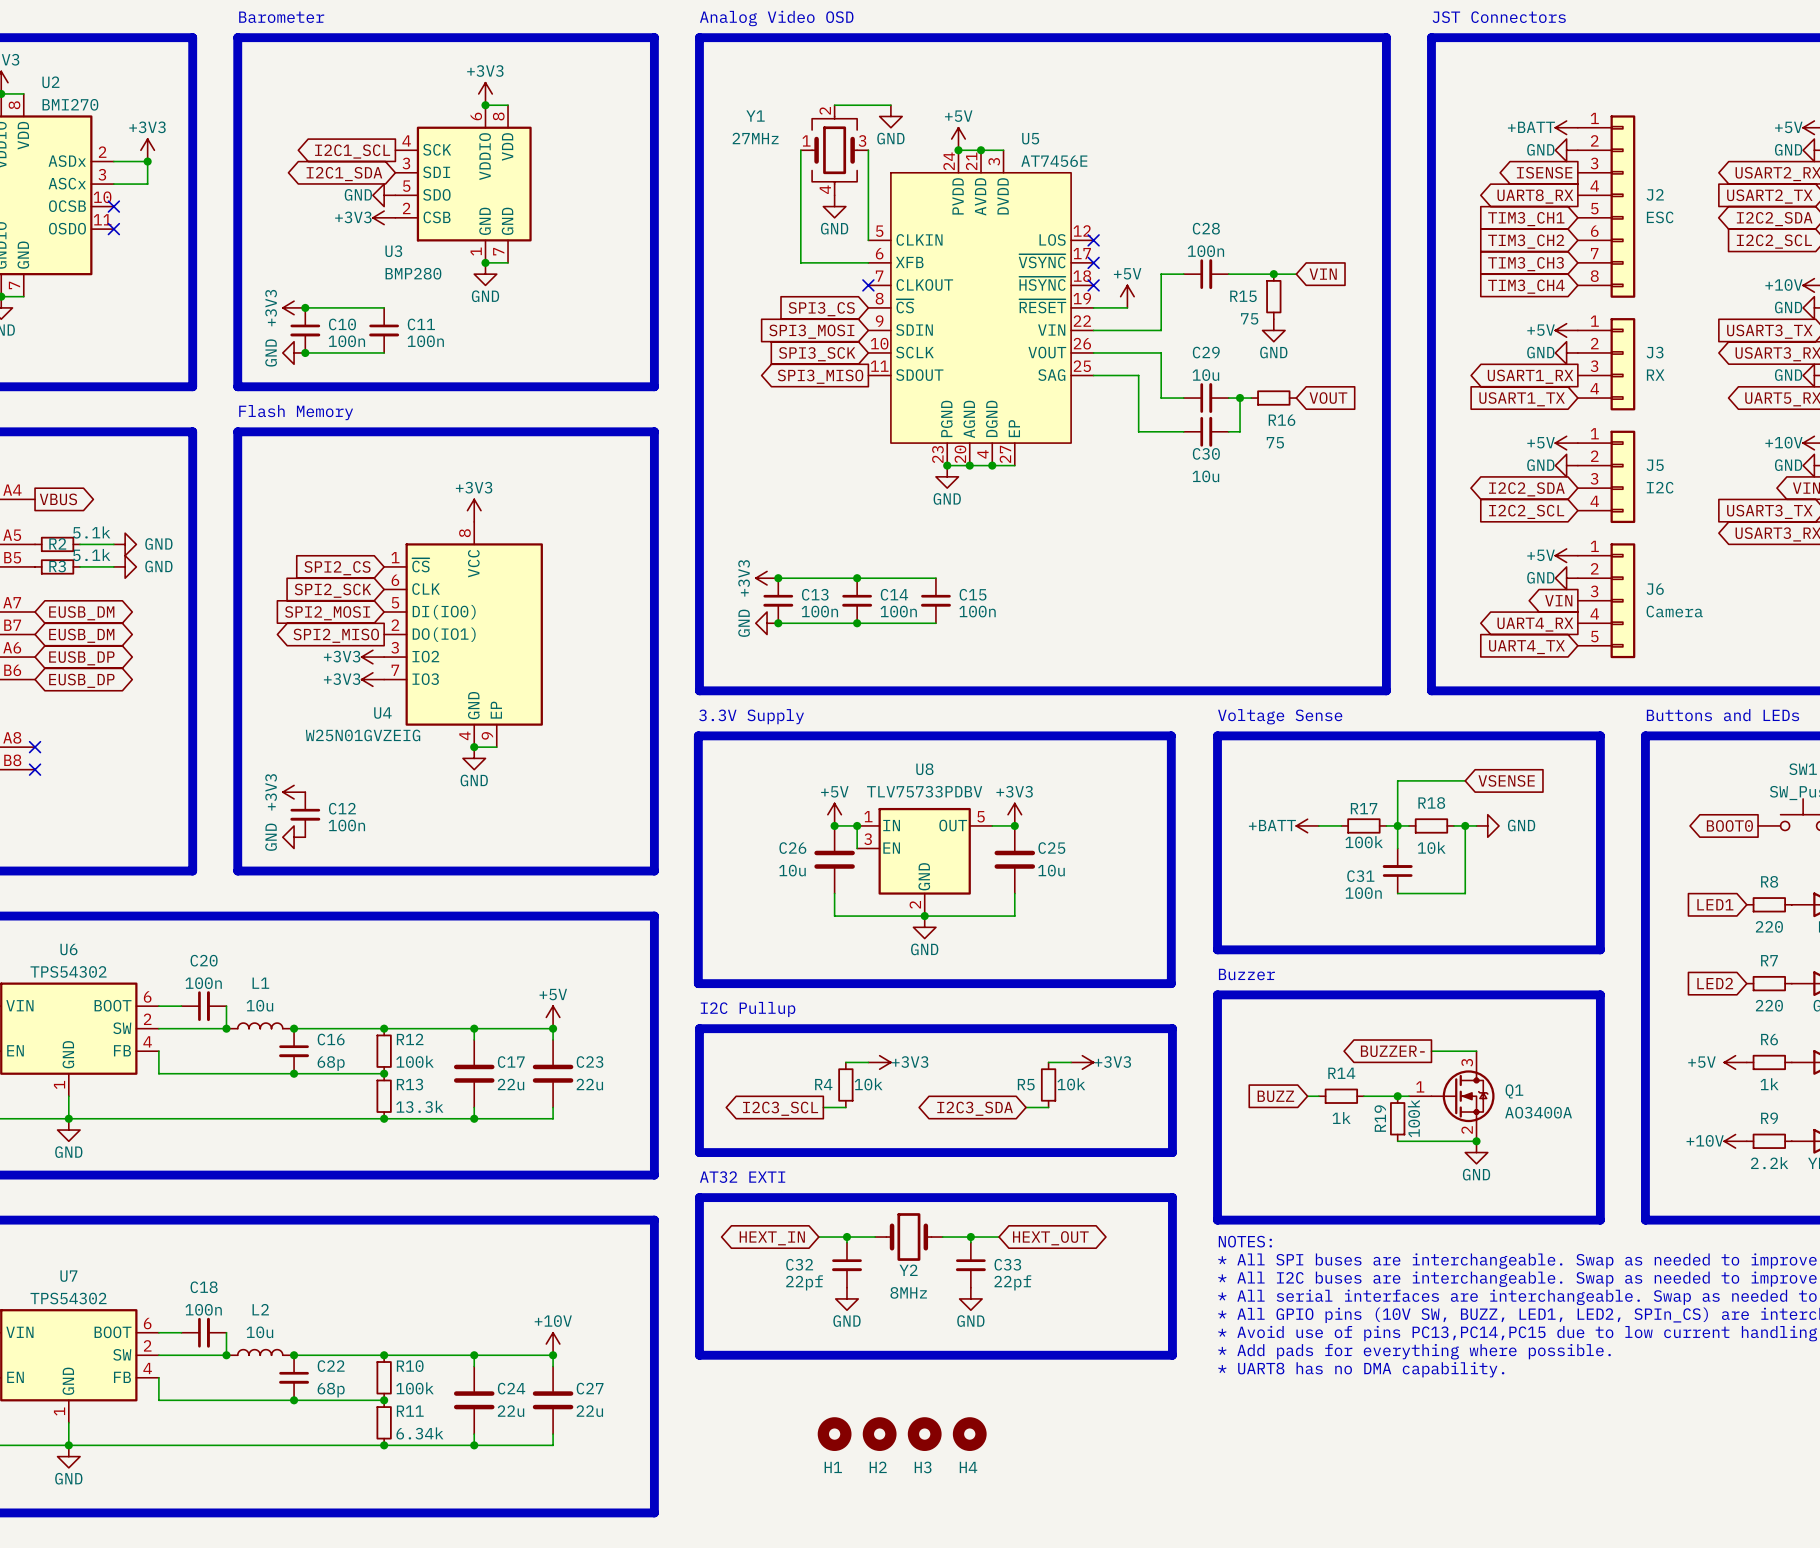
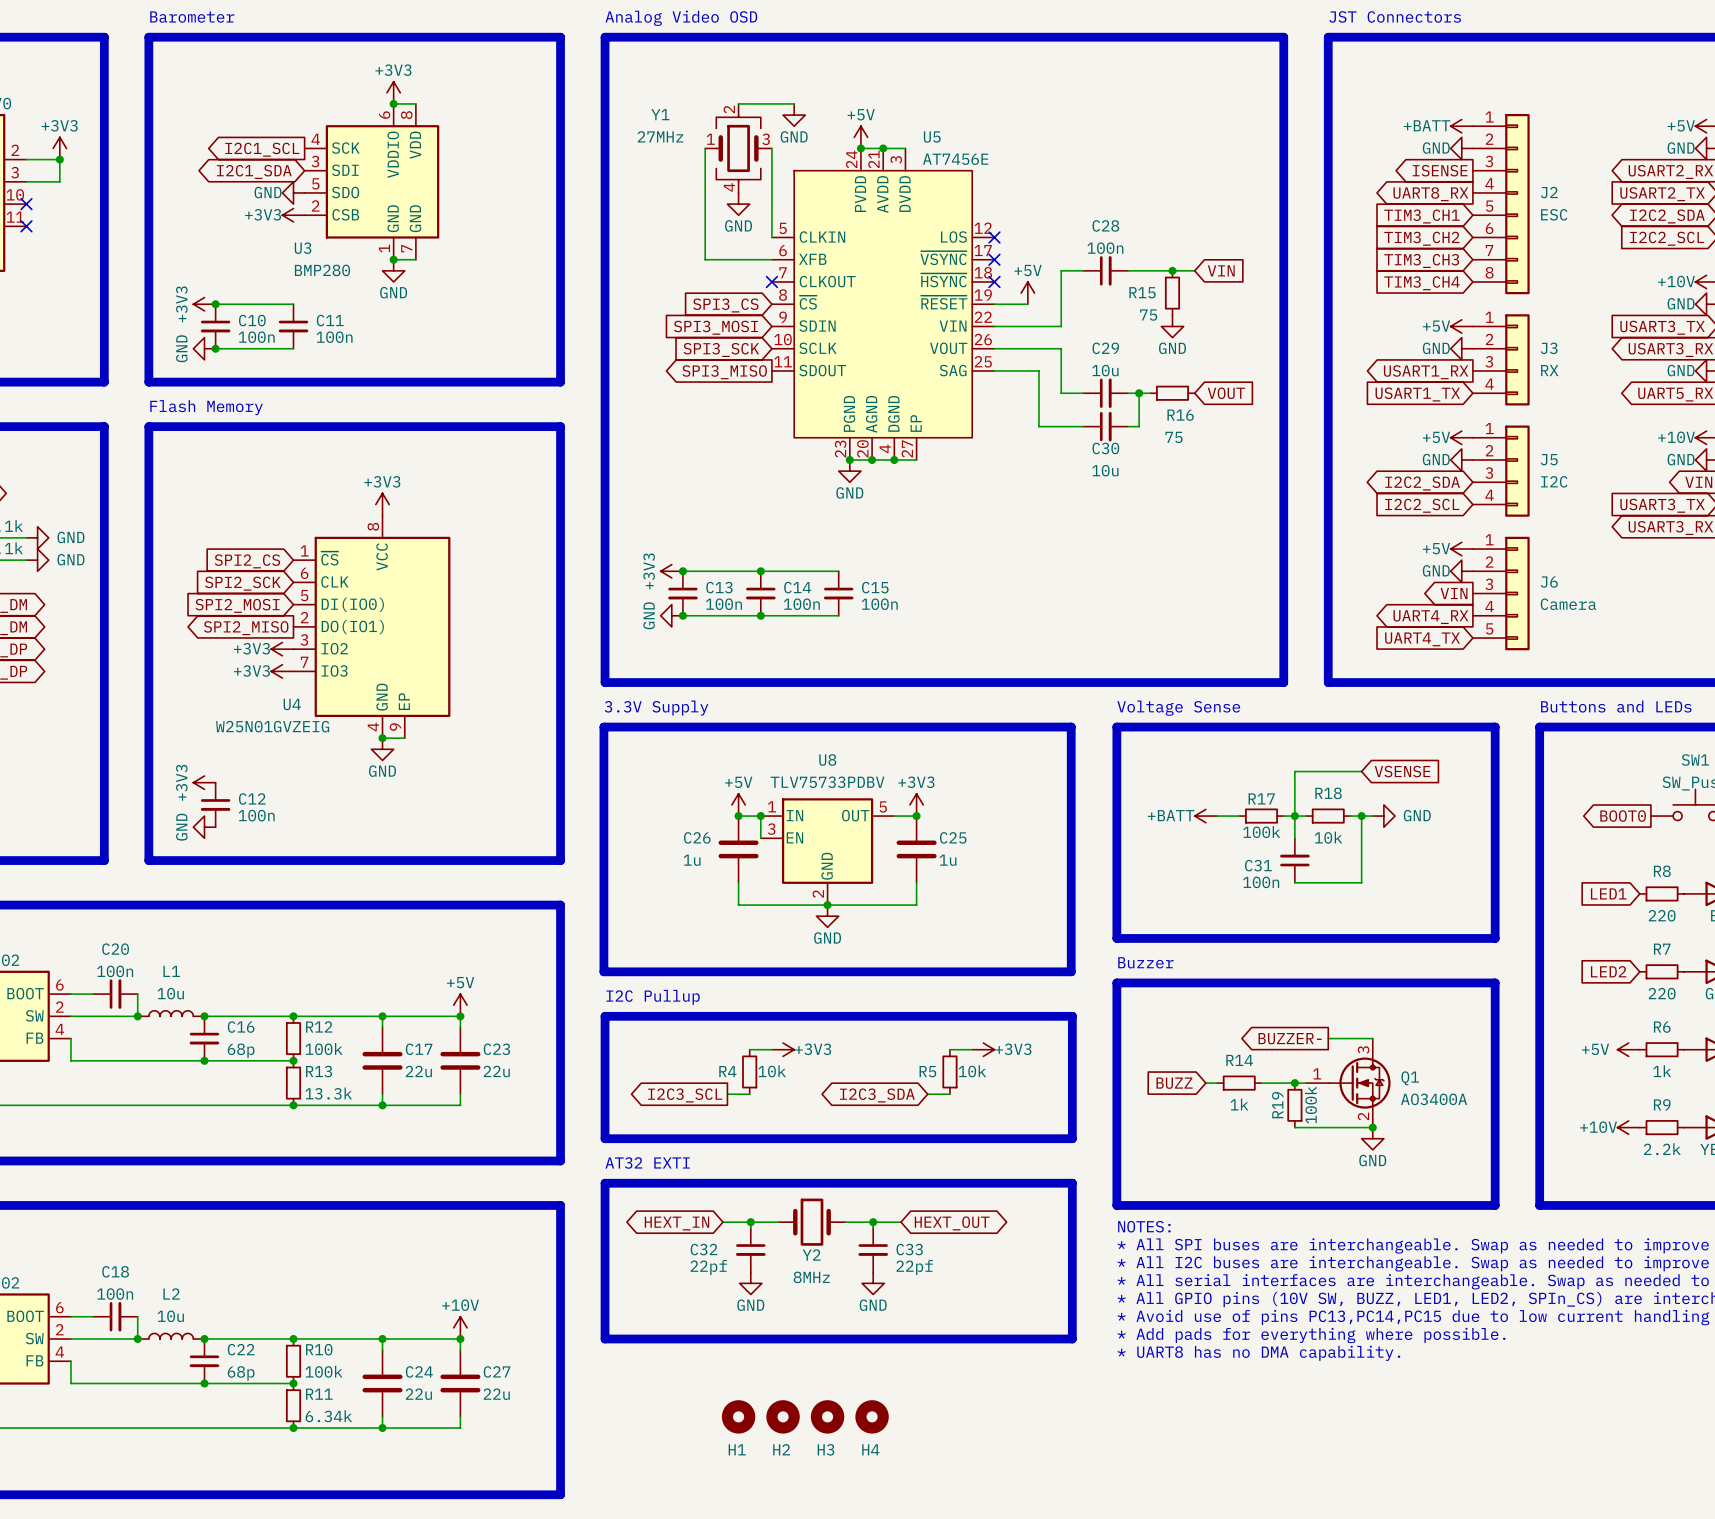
C26 value: 10u (792, 870) -> 1u (692, 860)
C25 value: 10u (1051, 870) -> 1u (948, 860)

